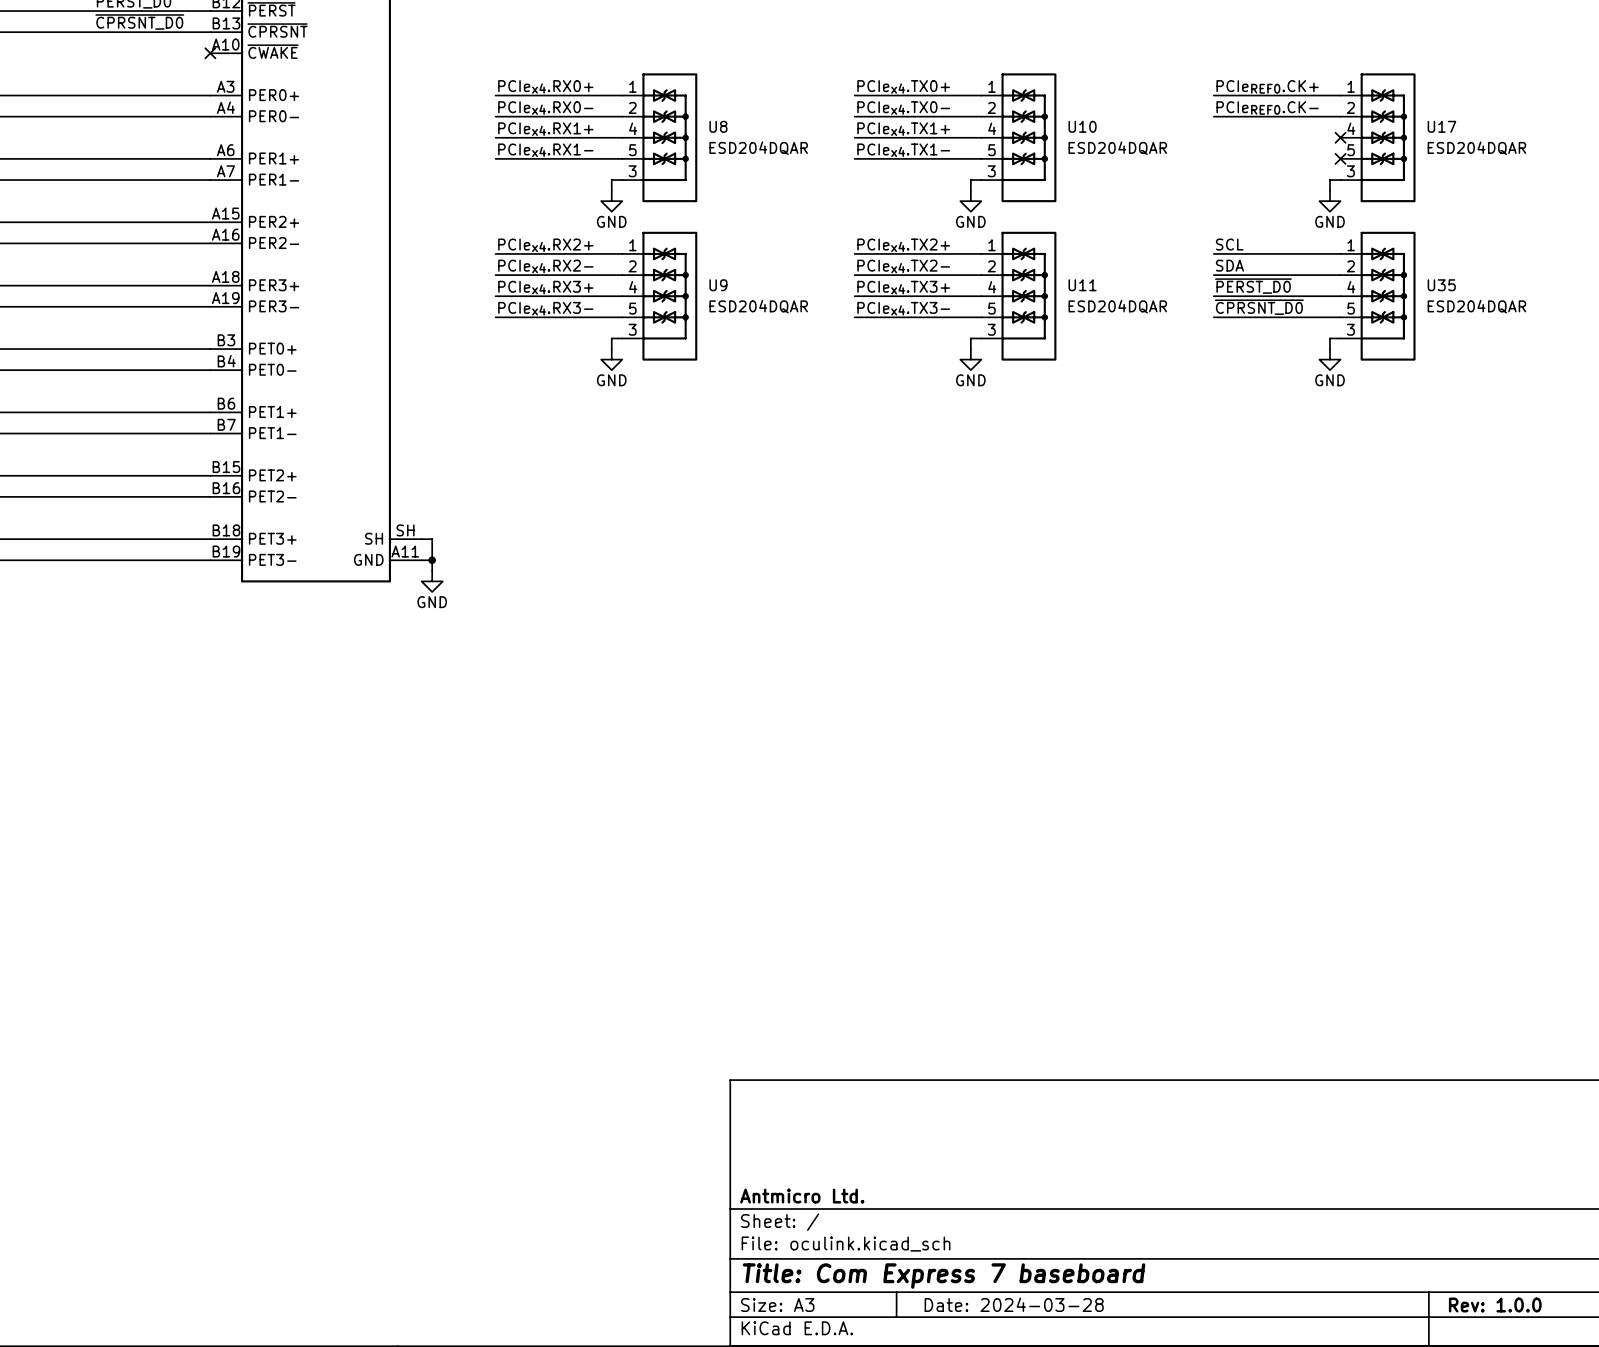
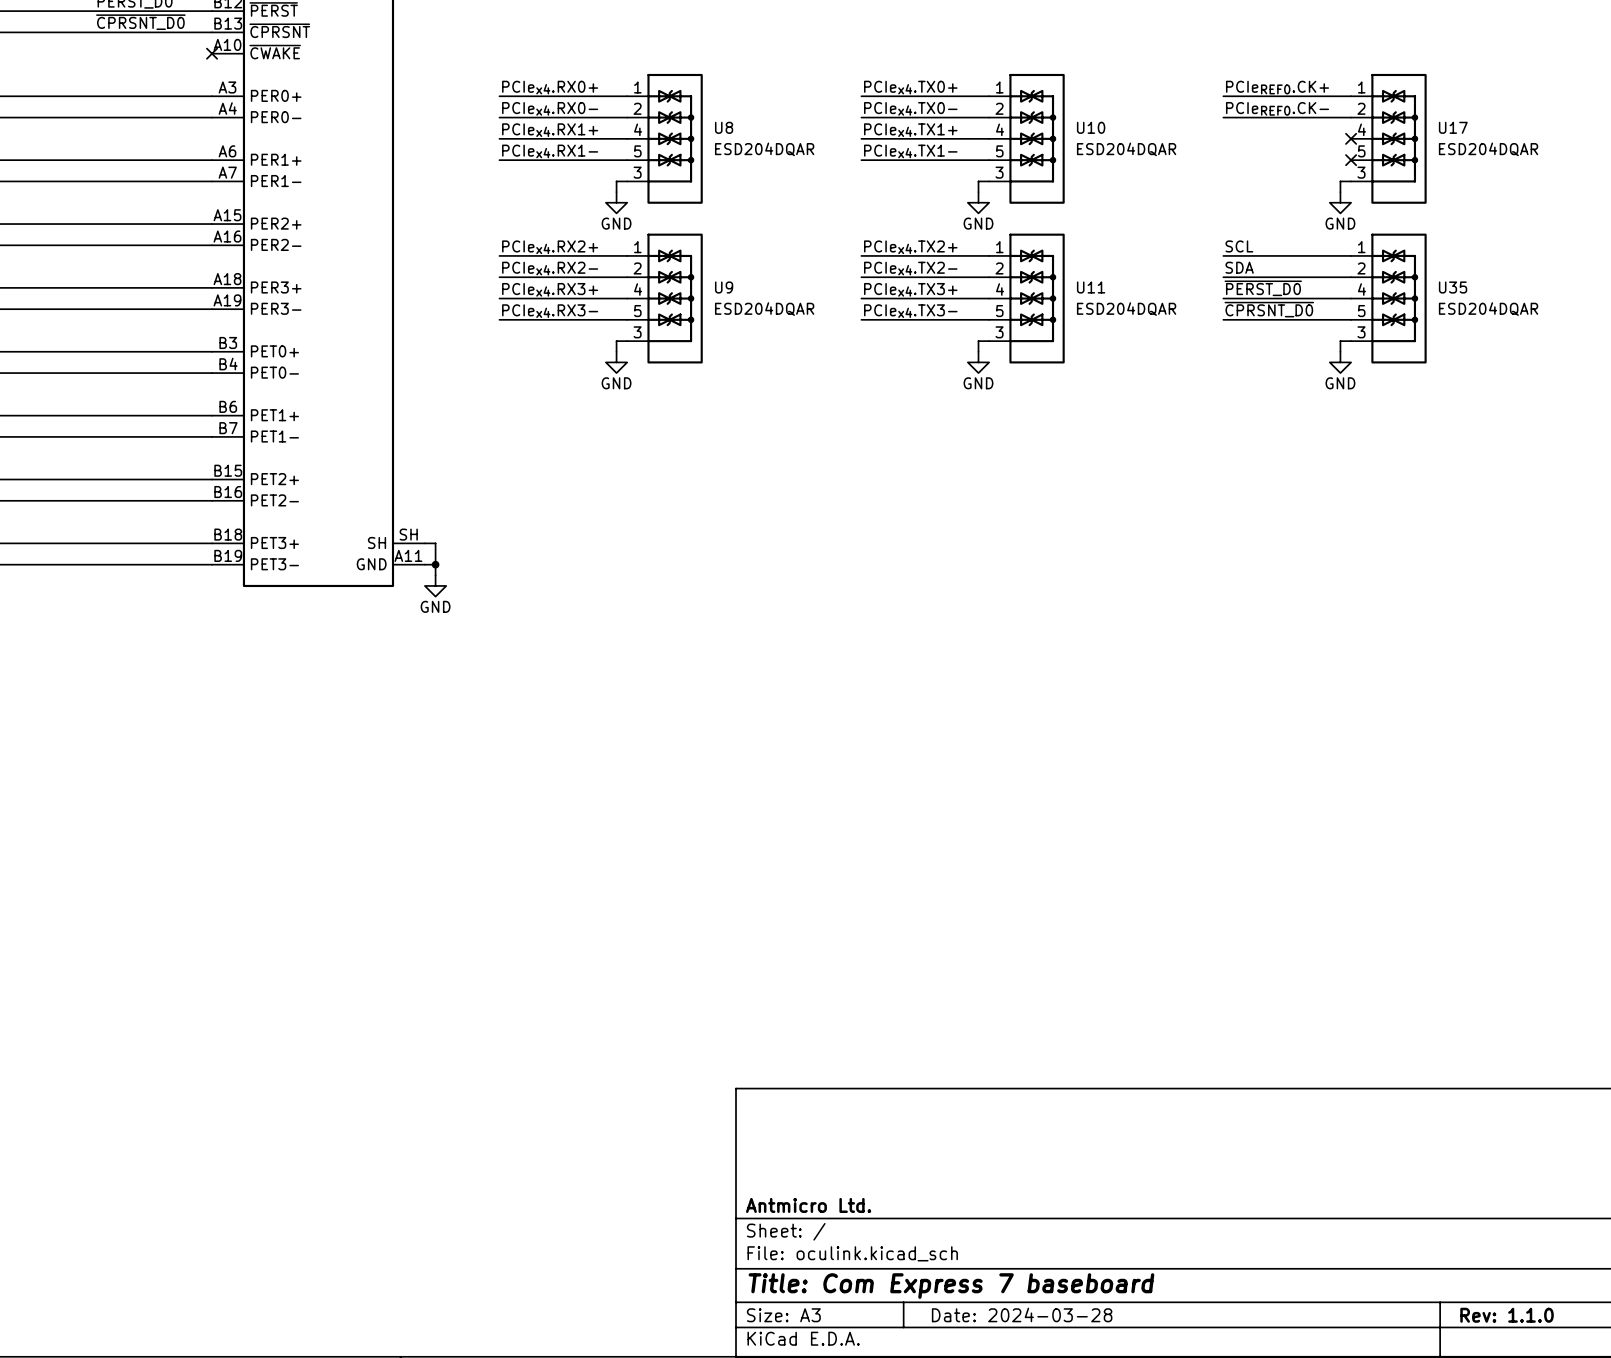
title block: Rev: 1.0.0 (1495, 1305) -> Rev: 1.1.0 (1507, 1315)

